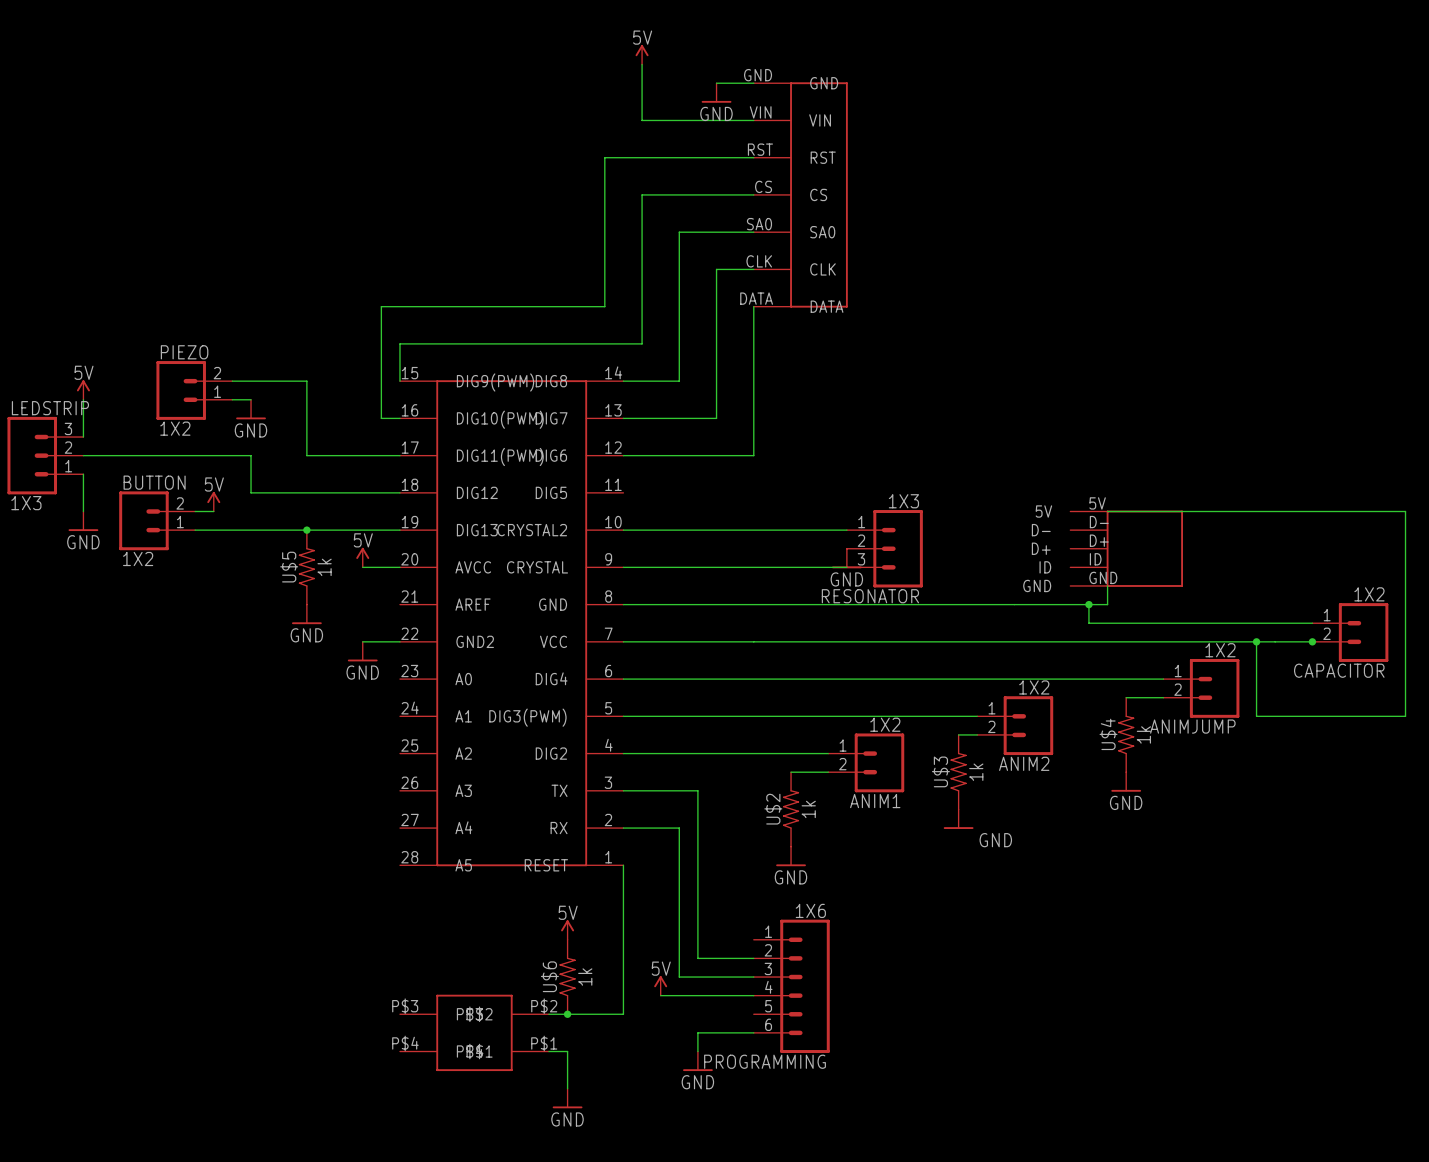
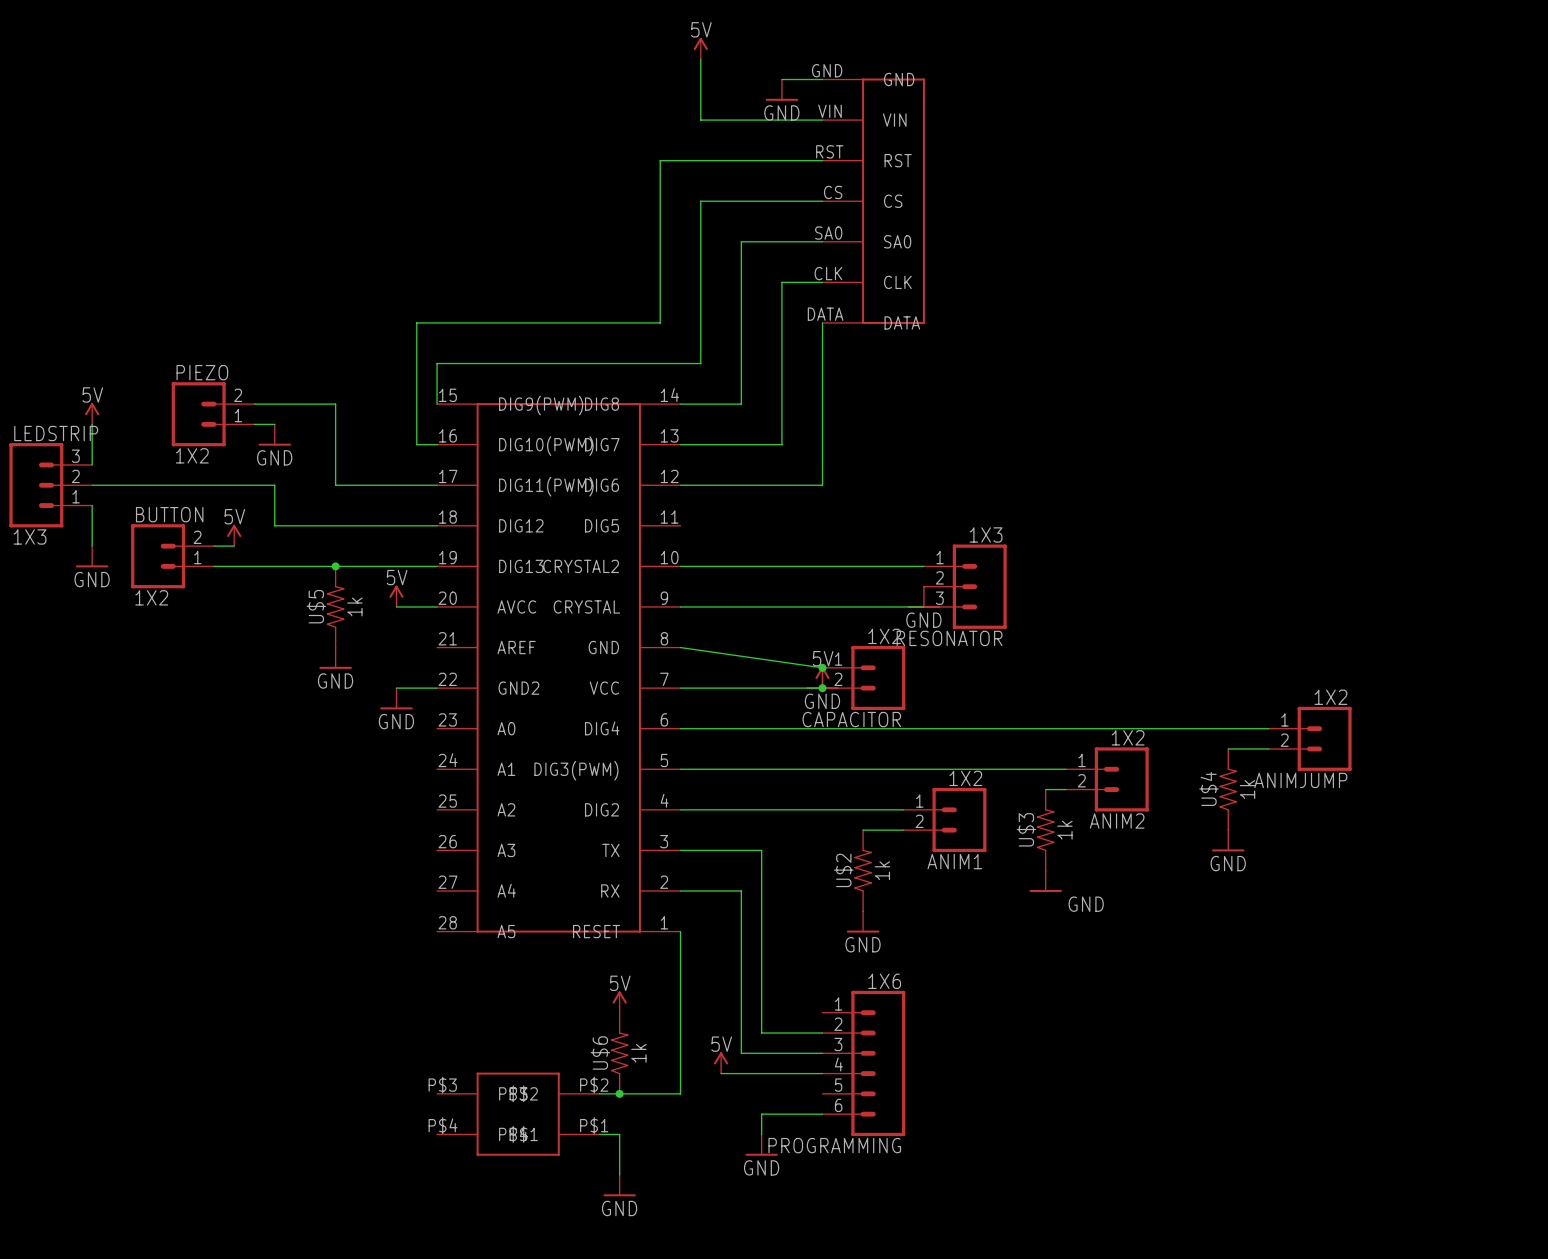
wire: (1107, 511) (1405, 511) (1405, 716) (1256, 716) (1256, 641) -> none
part: (1126, 548) -> none
wire: (1107, 585) (1107, 604) (623, 604) -> (822, 667) (680, 647)
wire: (1088, 604) (1088, 623) (1312, 623) -> none
junction: (1088, 604) -> none
junction: none -> (822, 667)
power symbol: none -> 5V (822, 677)
CAPACITOR: none -> 1X2 (863, 677)
CAPACITOR: 1X2 (1350, 632) -> none
power symbol: none -> GND (822, 678)
wire: (753, 641) (1312, 641) -> none
junction: none -> (822, 688)
junction: (1256, 641) -> none
junction: (1312, 641) -> none

